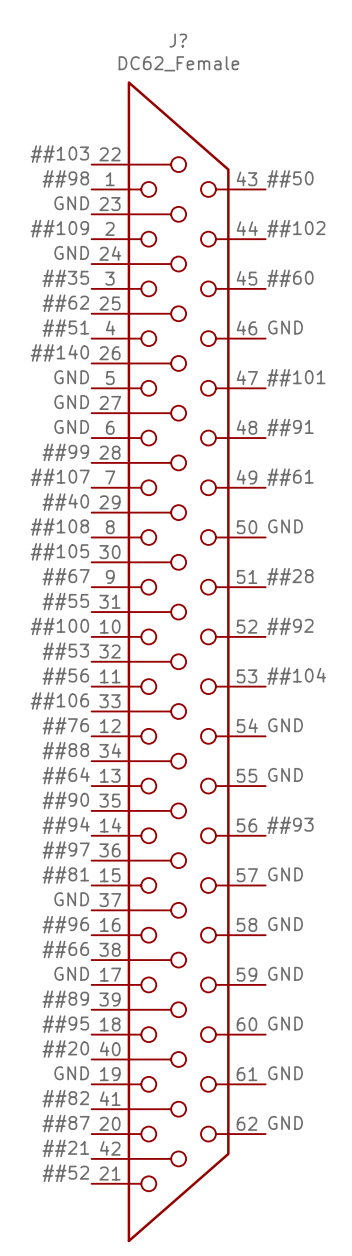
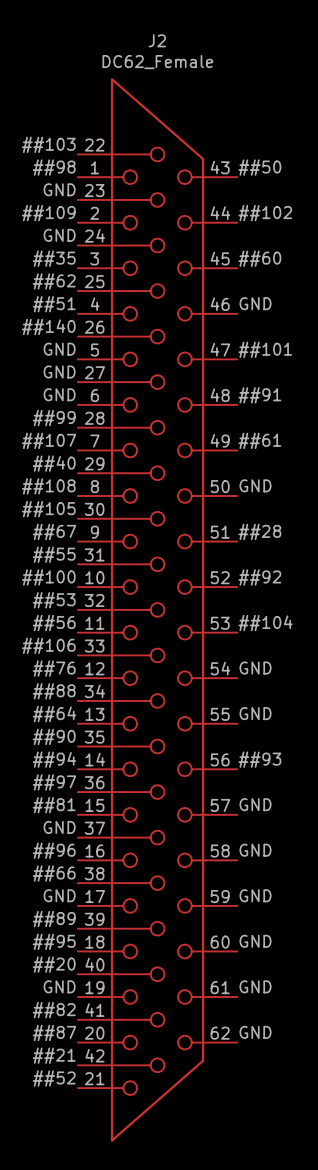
J? name: J? (178, 40) -> J2 (157, 40)

